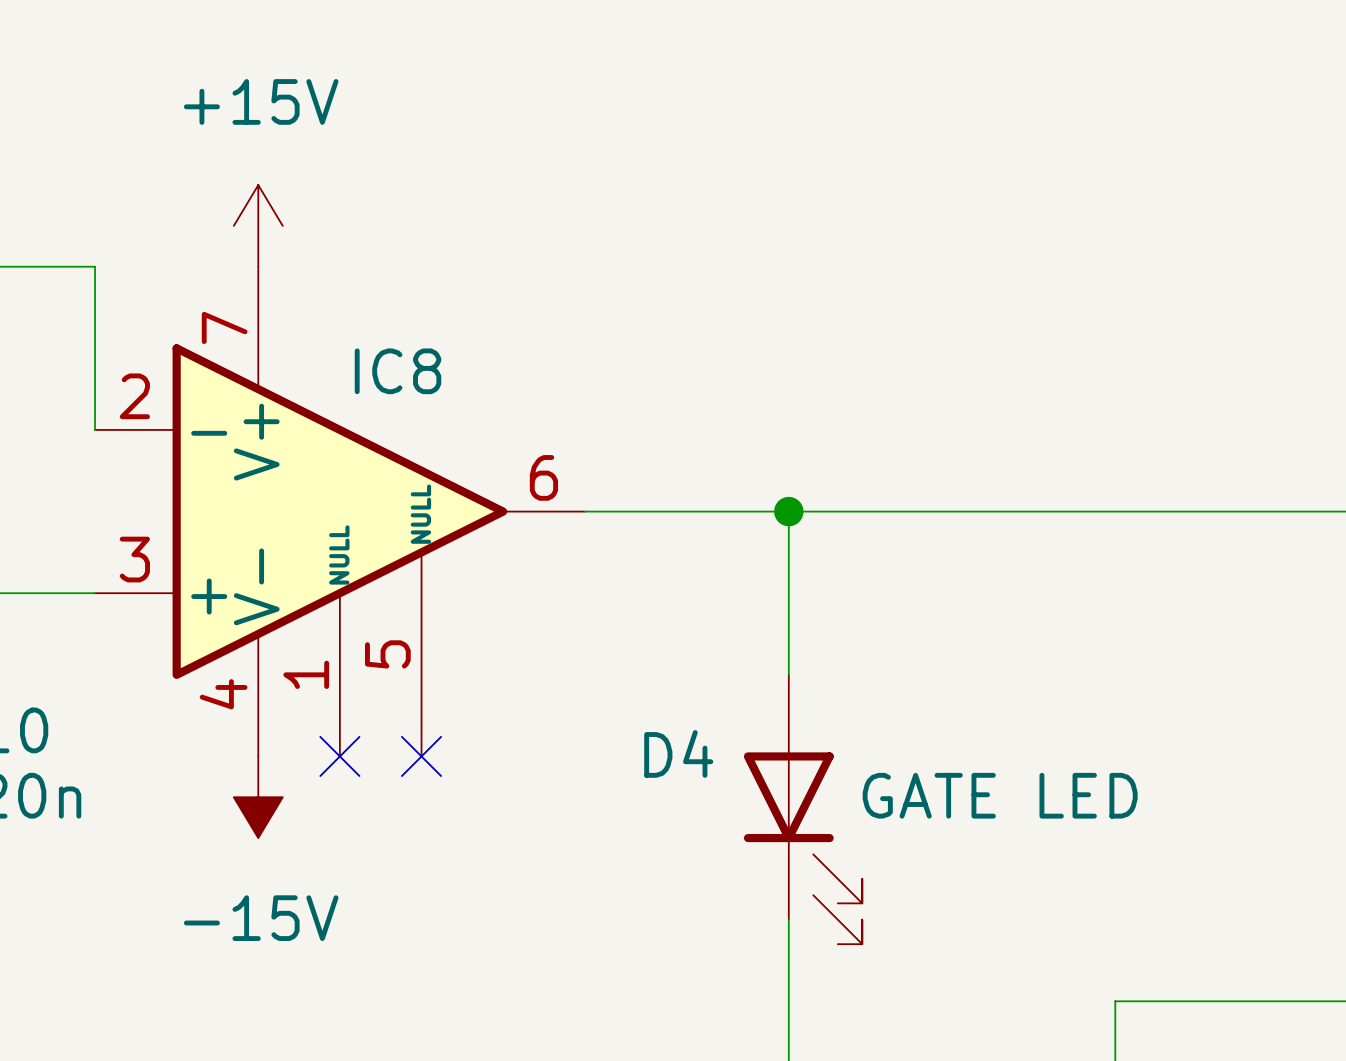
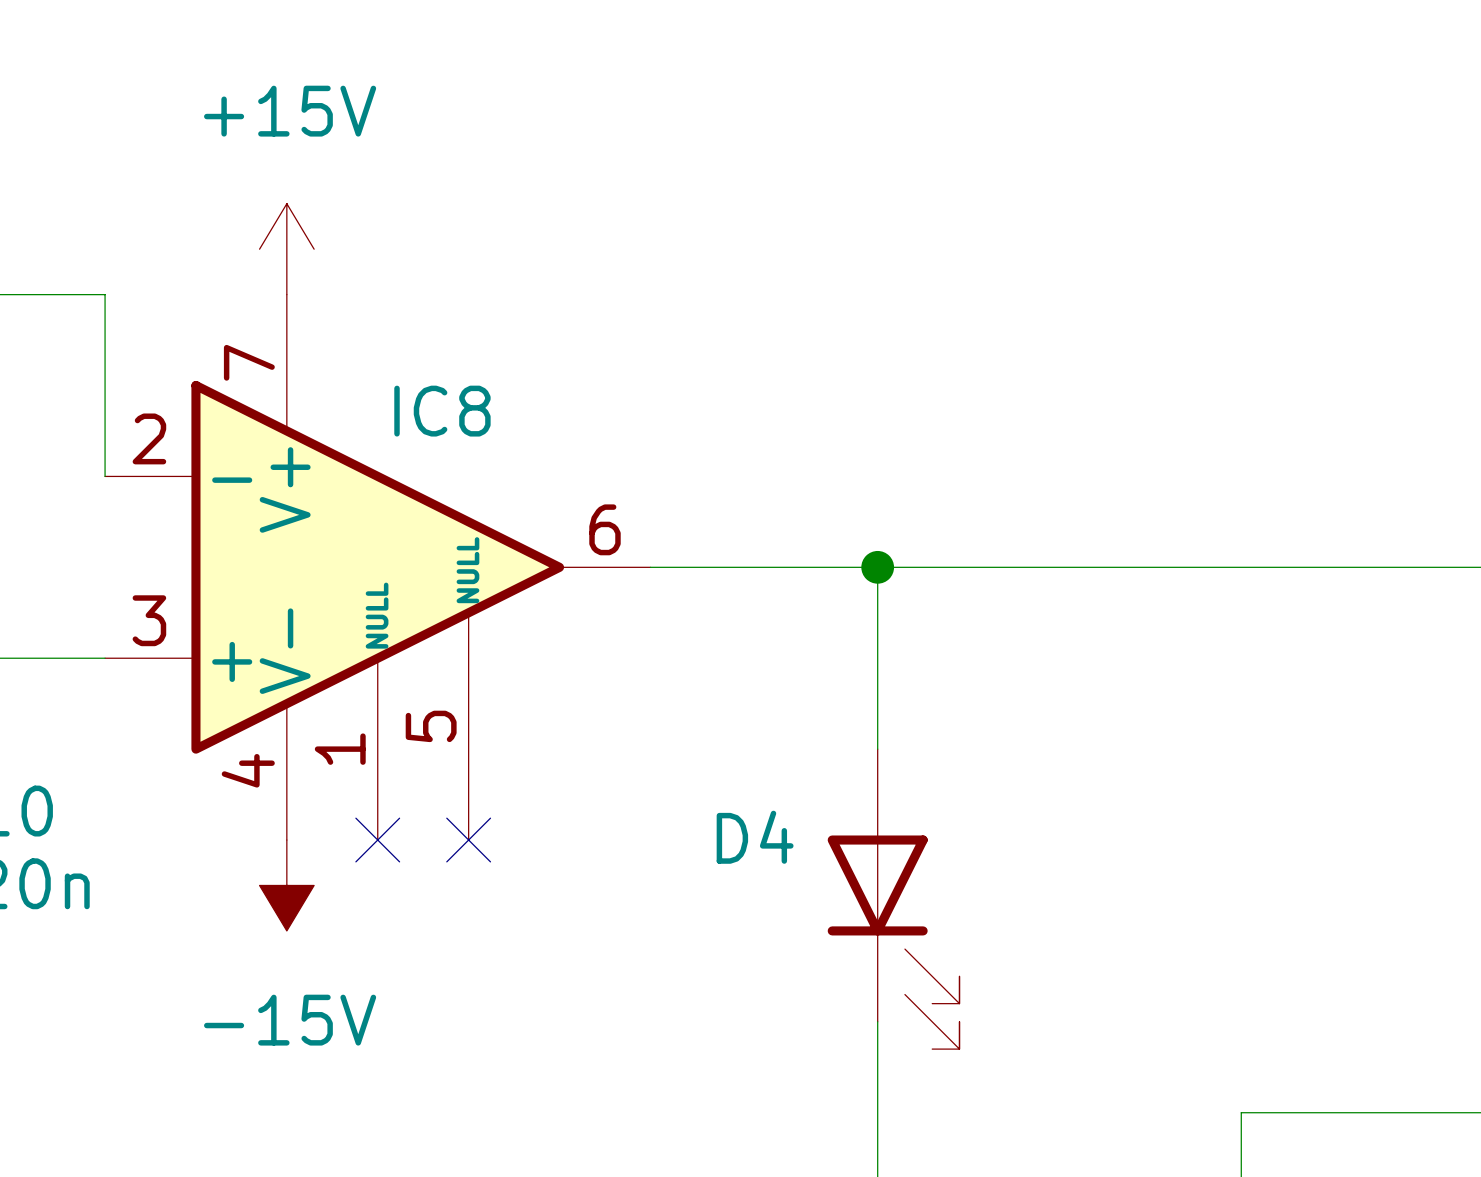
D4 value: GATE LED (1000, 795) -> none

